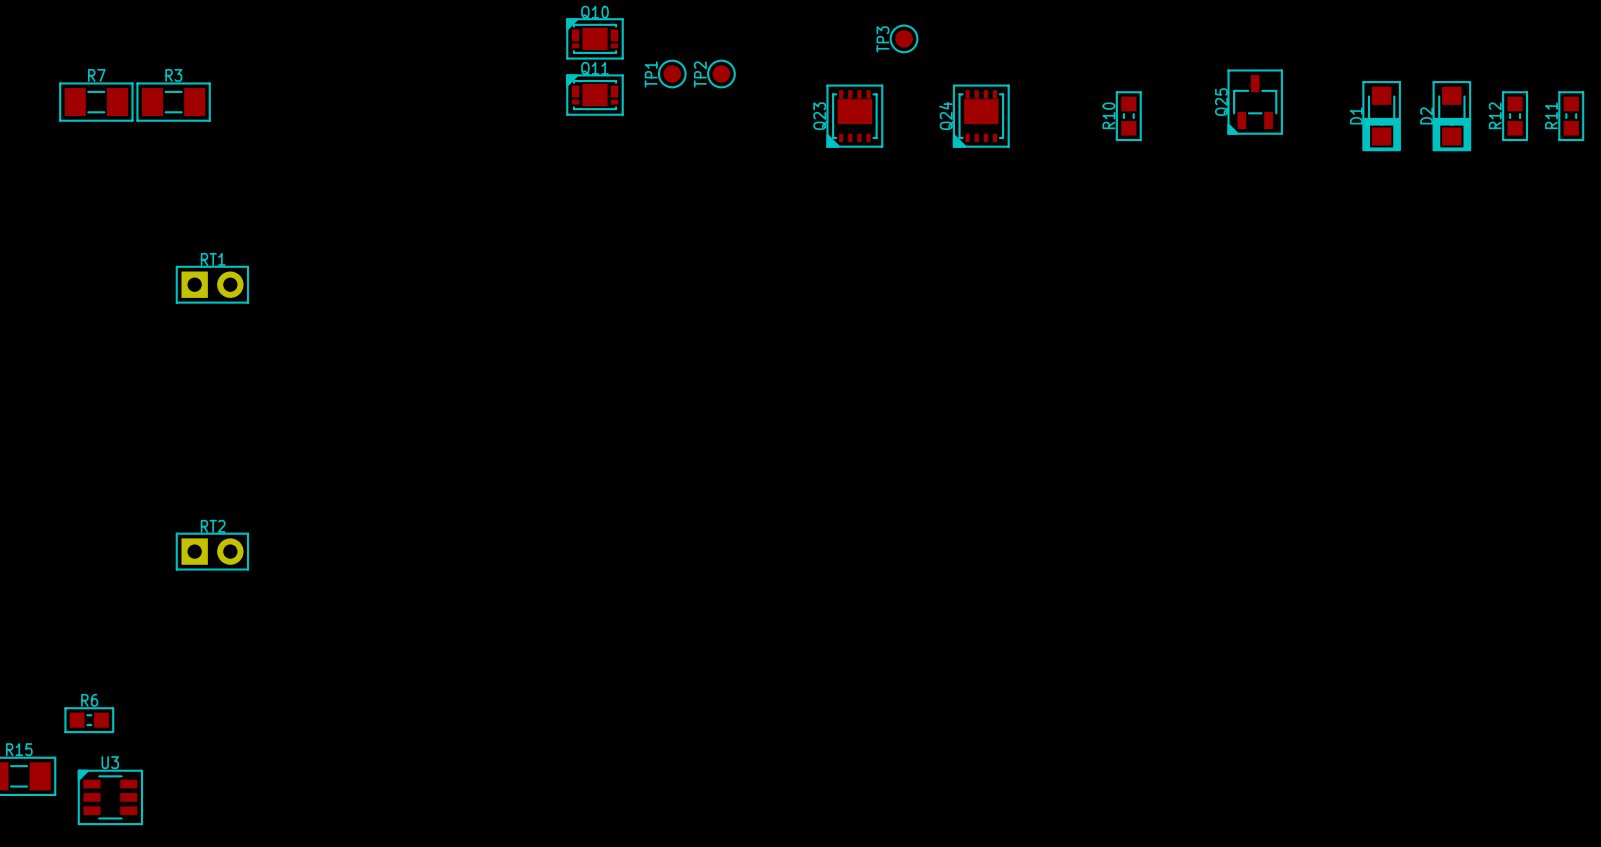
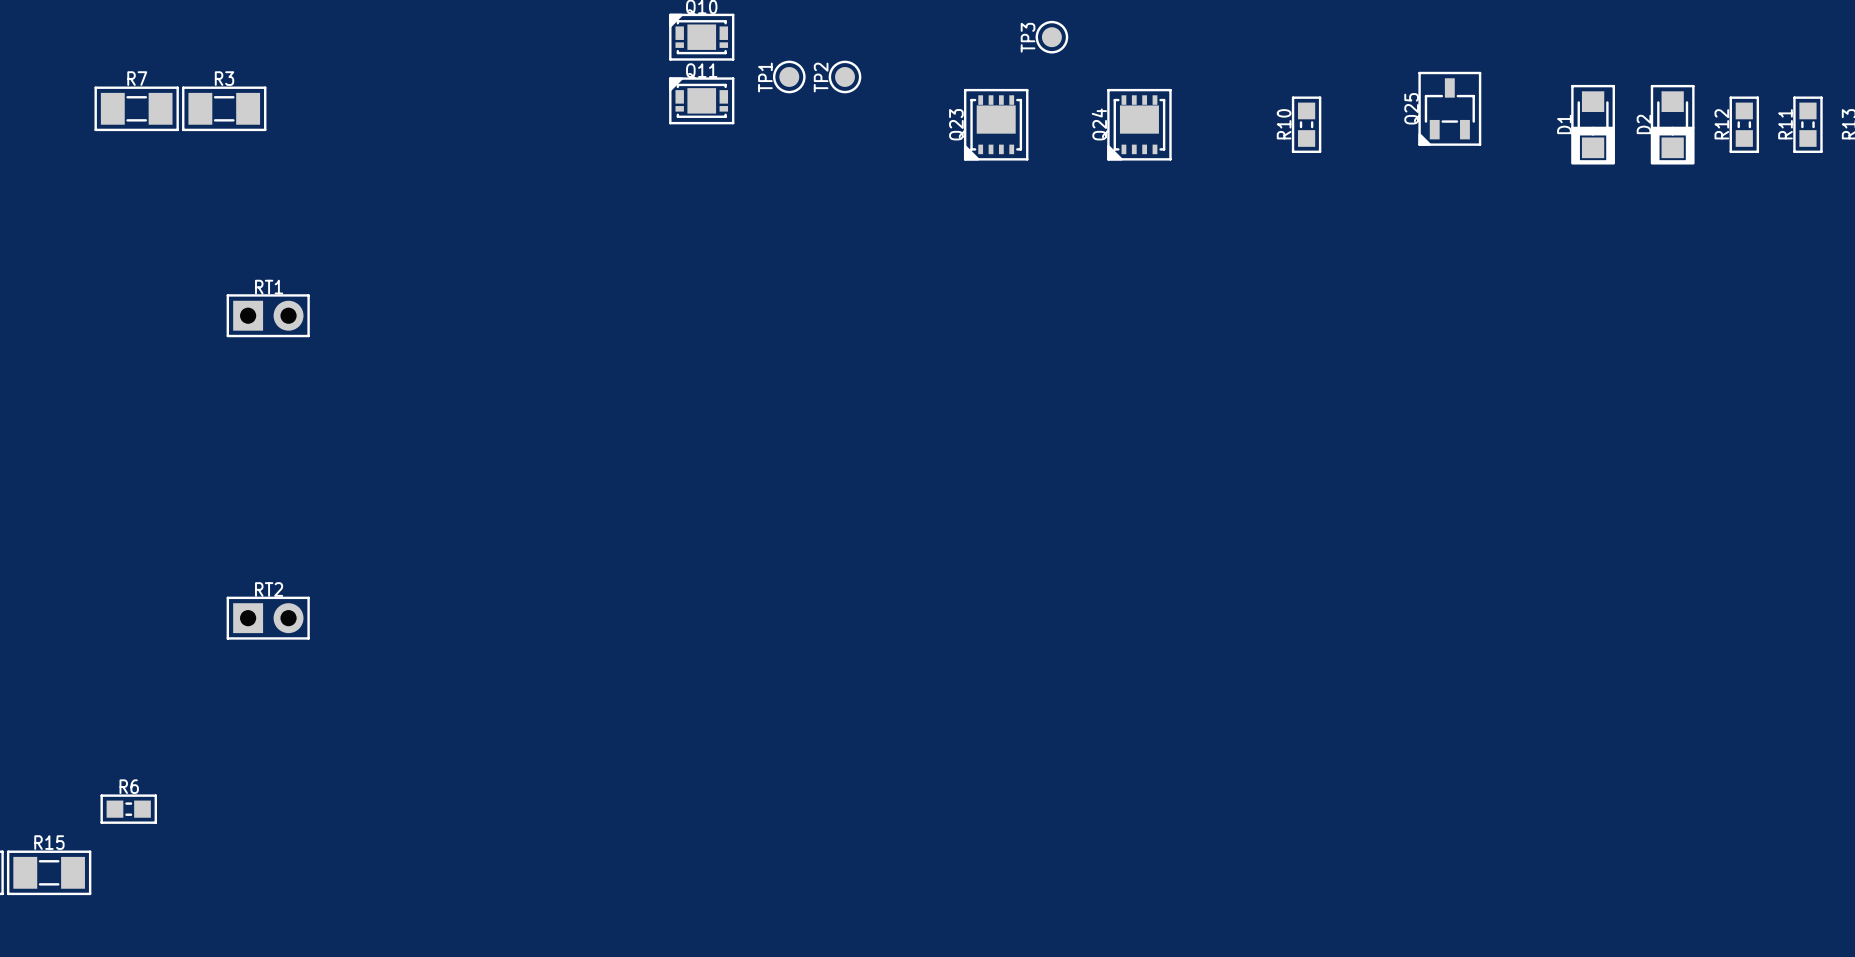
U3: (110, 797) -> none

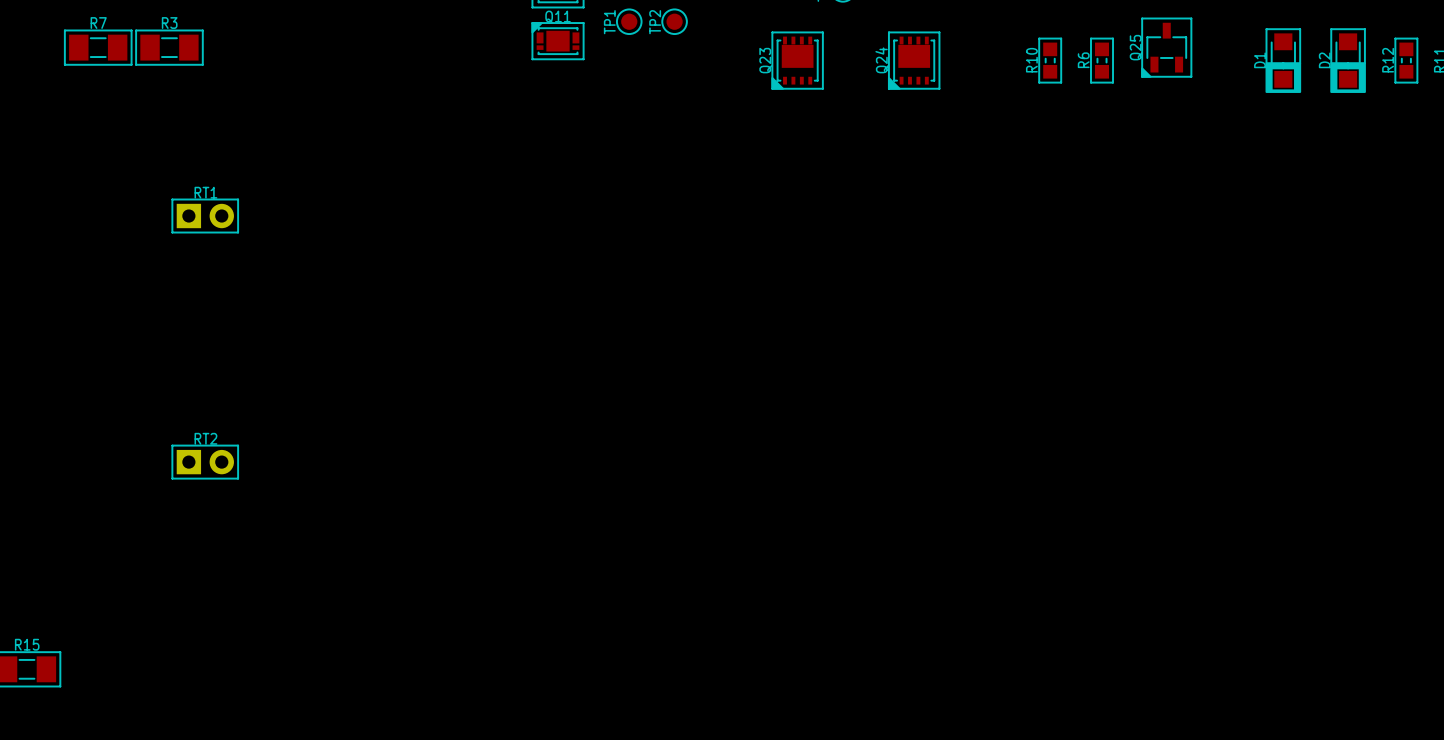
R6 rotation: 0° (128, 809) -> 90° clockwise (1102, 60)
R6 position: (128, 809) -> (1102, 60)

